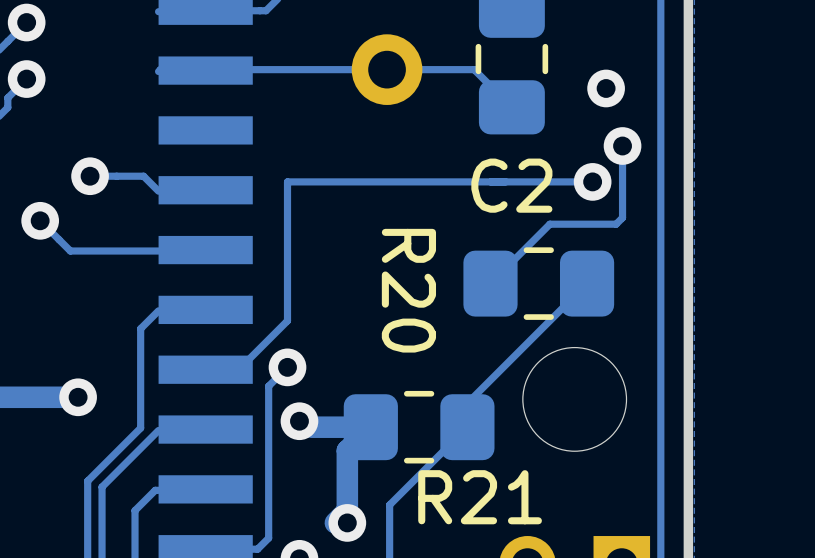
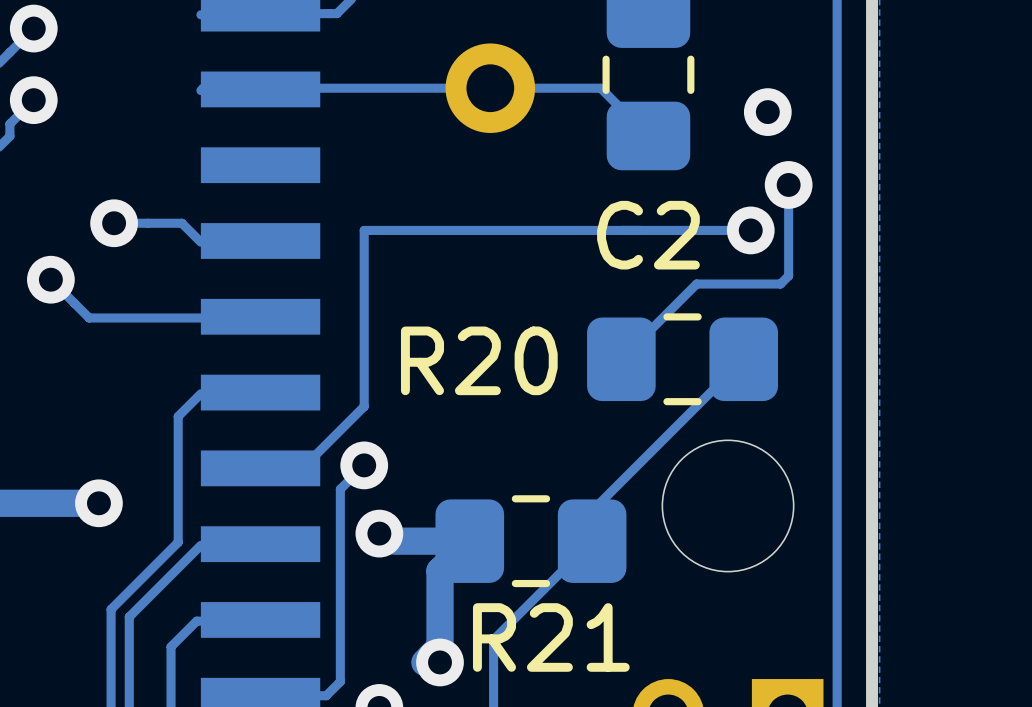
R20 name rotation: 0° (408, 290) -> 90° counterclockwise (479, 360)
R21 name position: R21 (480, 497) -> R21 (551, 637)

